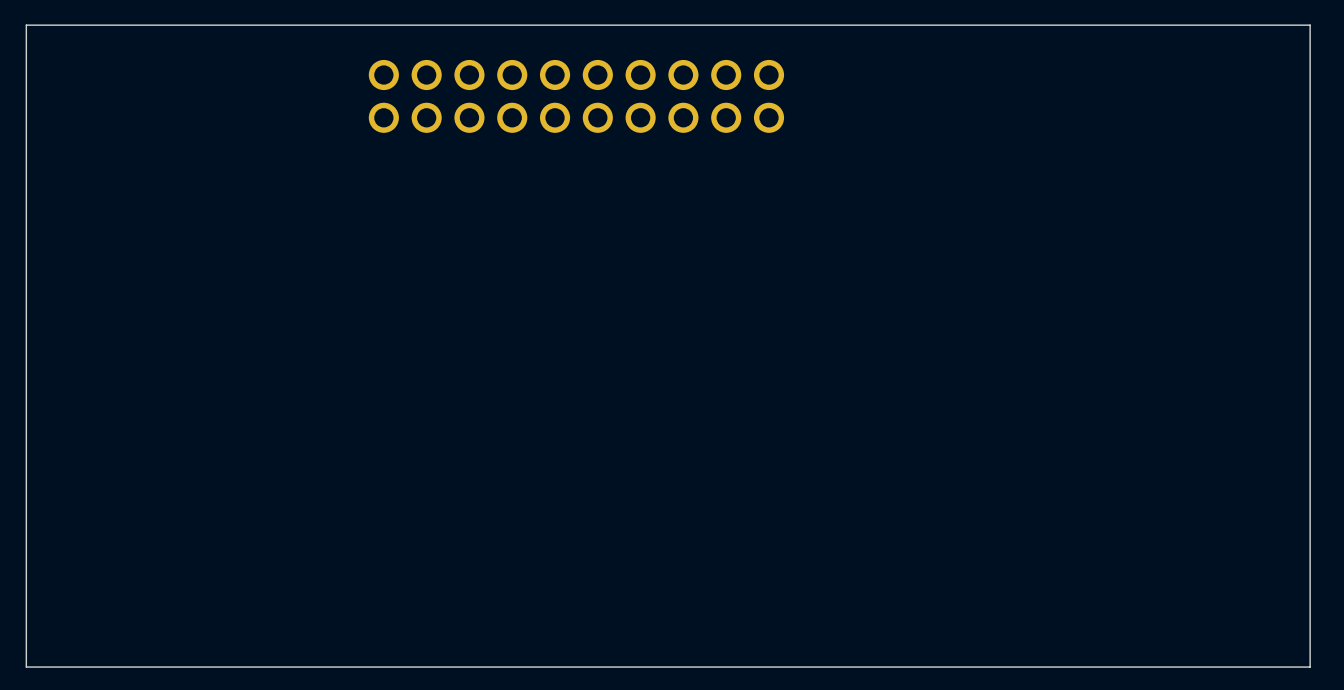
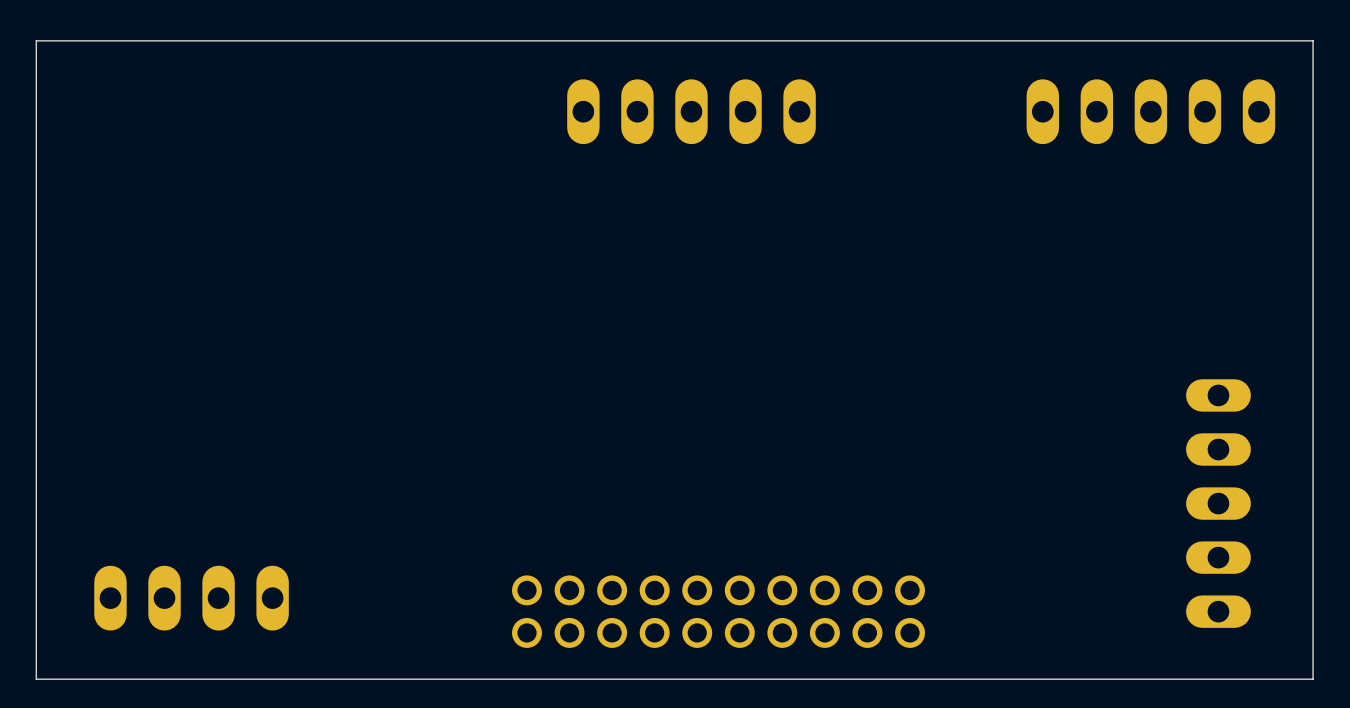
part position: (576, 96) -> (718, 611)
part: none -> (691, 111)
part: none -> (1150, 111)
part: none -> (1218, 503)
part: none -> (191, 598)

